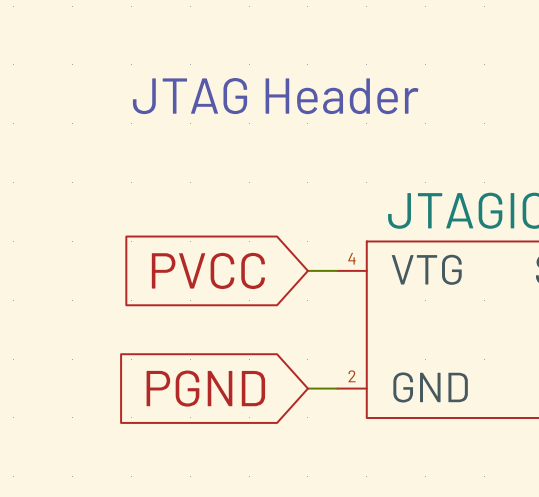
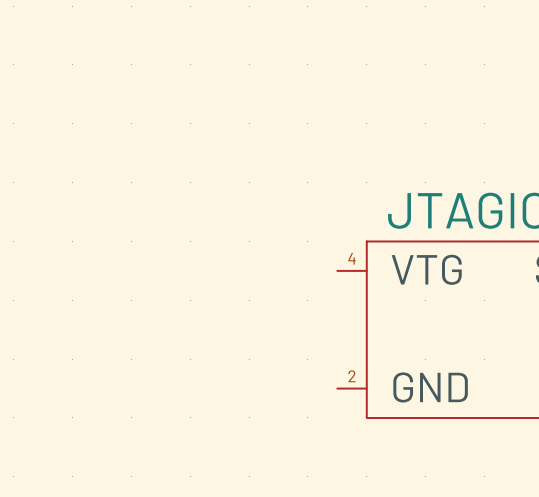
text: JTAG Header (275, 96) -> none
global label: PVCC (208, 270) -> none
wire: (307, 270) (337, 270) -> none
global label: PGND (205, 388) -> none
wire: (307, 388) (337, 388) -> none

